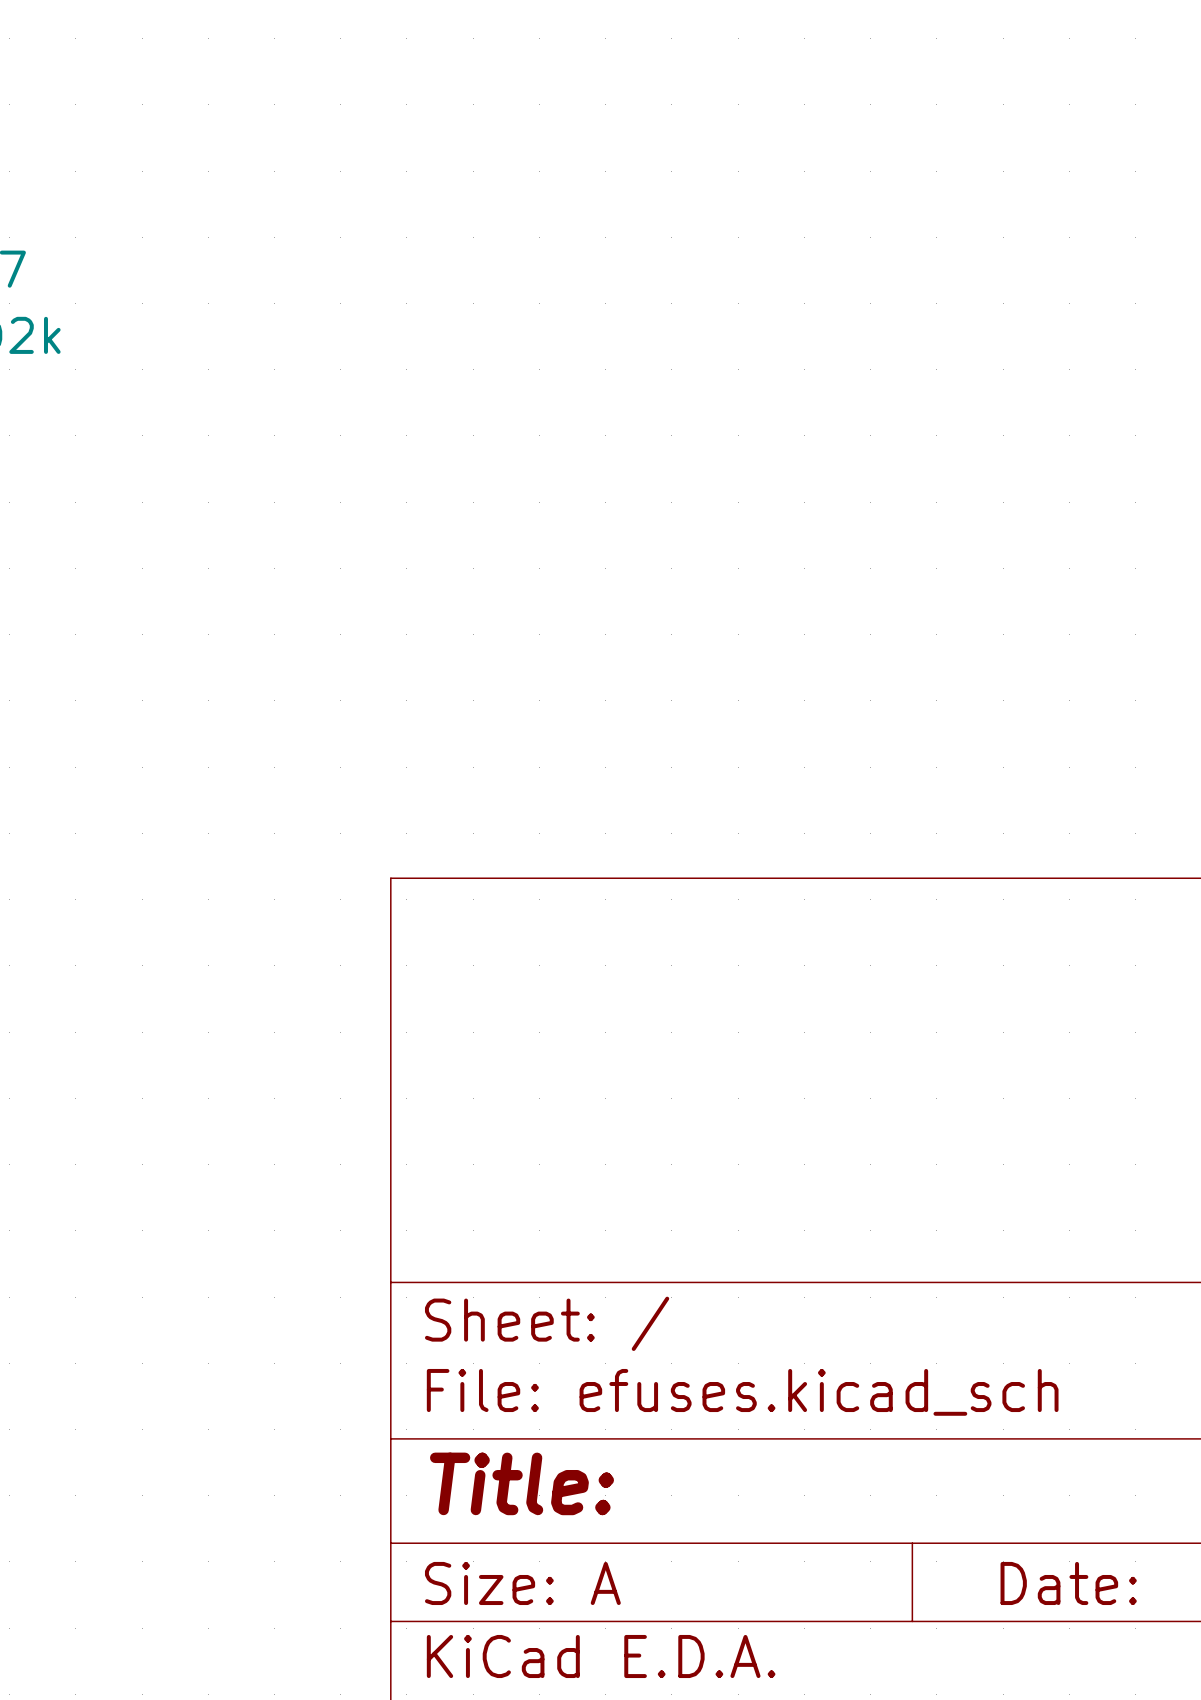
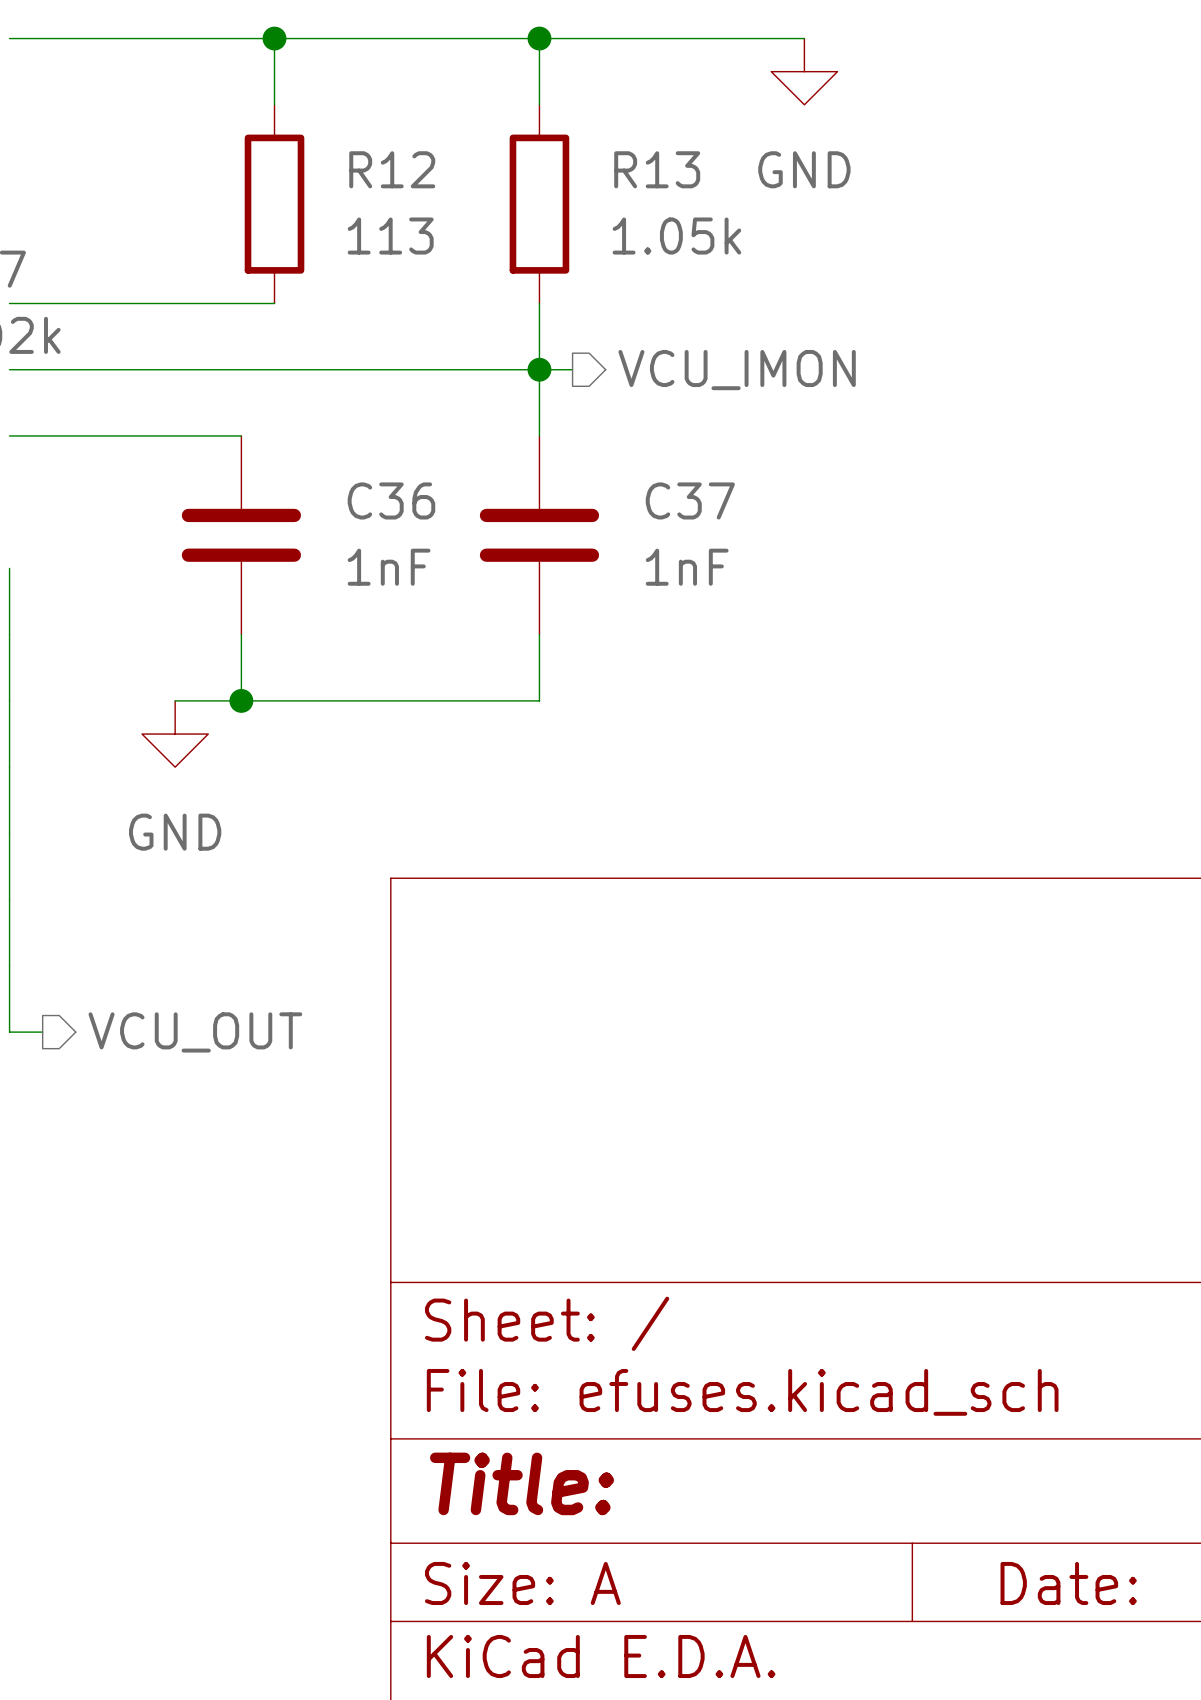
wire: none -> (9, 38) (804, 38)
wire: none -> (274, 38) (274, 104)
junction: none -> (274, 38)
wire: none -> (539, 38) (539, 104)
junction: none -> (539, 38)
power symbol: none -> GND (804, 71)
R12: none -> 113 (274, 204)
R13: none -> 1.05k (539, 204)
wire: none -> (9, 303) (274, 303)
wire: none -> (539, 303) (539, 435)
wire: none -> (9, 369) (572, 369)
junction: none -> (539, 369)
hierarchical label: none -> VCU_IMON (737, 370)
wire: none -> (9, 435) (241, 435)
C36: none -> 1nF (241, 535)
C37: none -> 1nF (539, 535)
wire: none -> (9, 568) (9, 1032) (42, 1032)
wire: none -> (241, 634) (241, 700)
wire: none -> (539, 634) (539, 700) (175, 700)
junction: none -> (241, 700)
power symbol: none -> GND (175, 734)
hierarchical label: none -> VCU_OUT (195, 1032)

